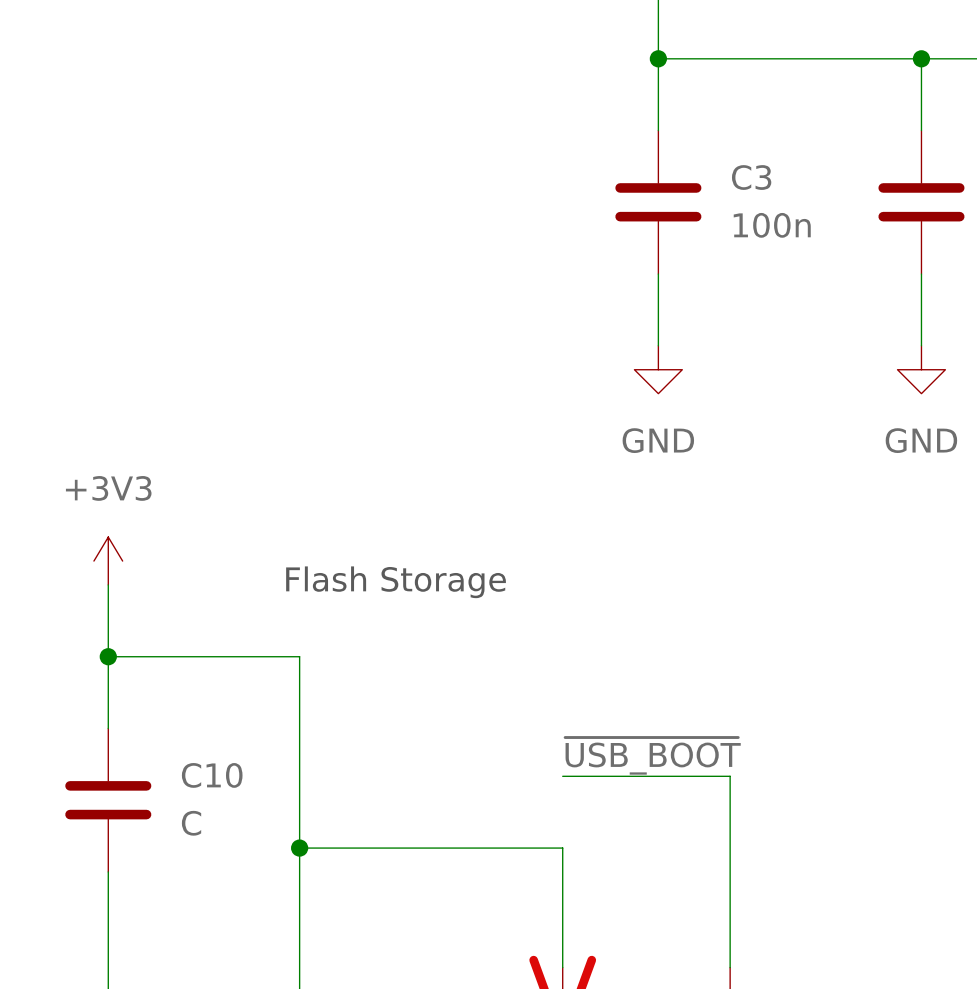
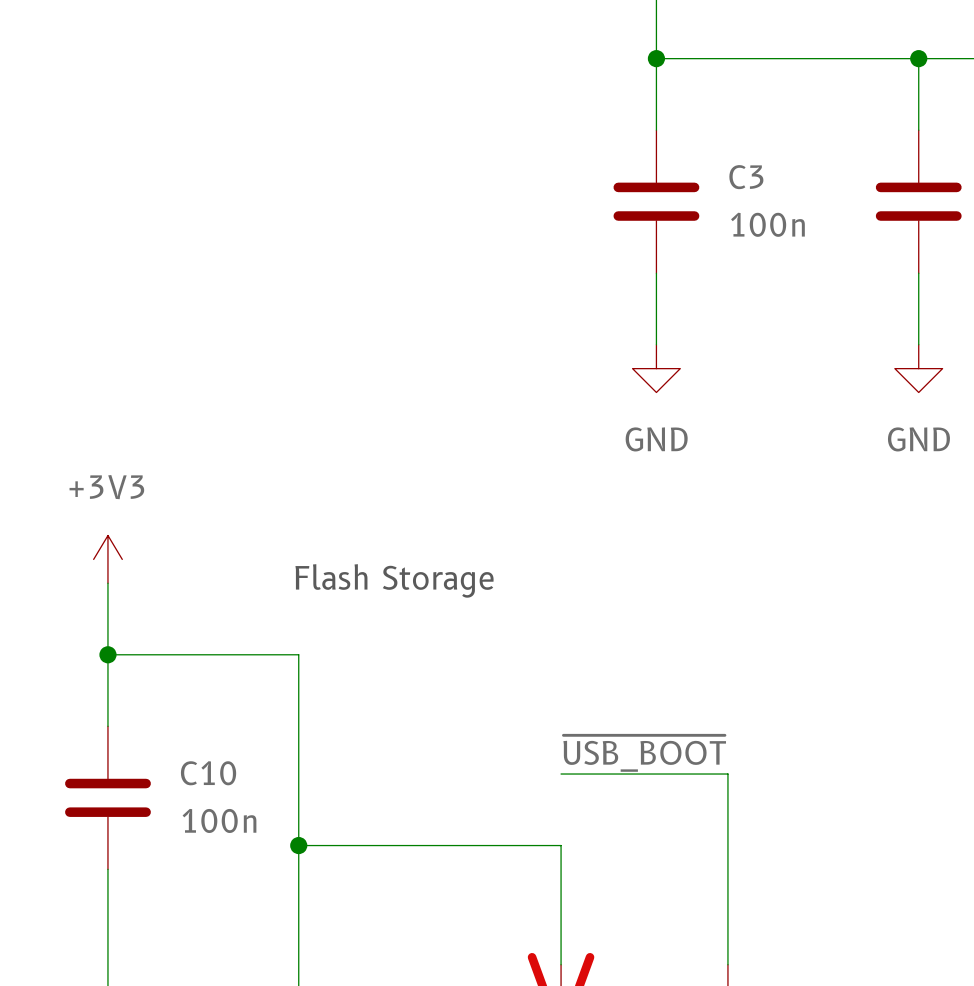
C10 value: C (191, 823) -> 100n (219, 820)

